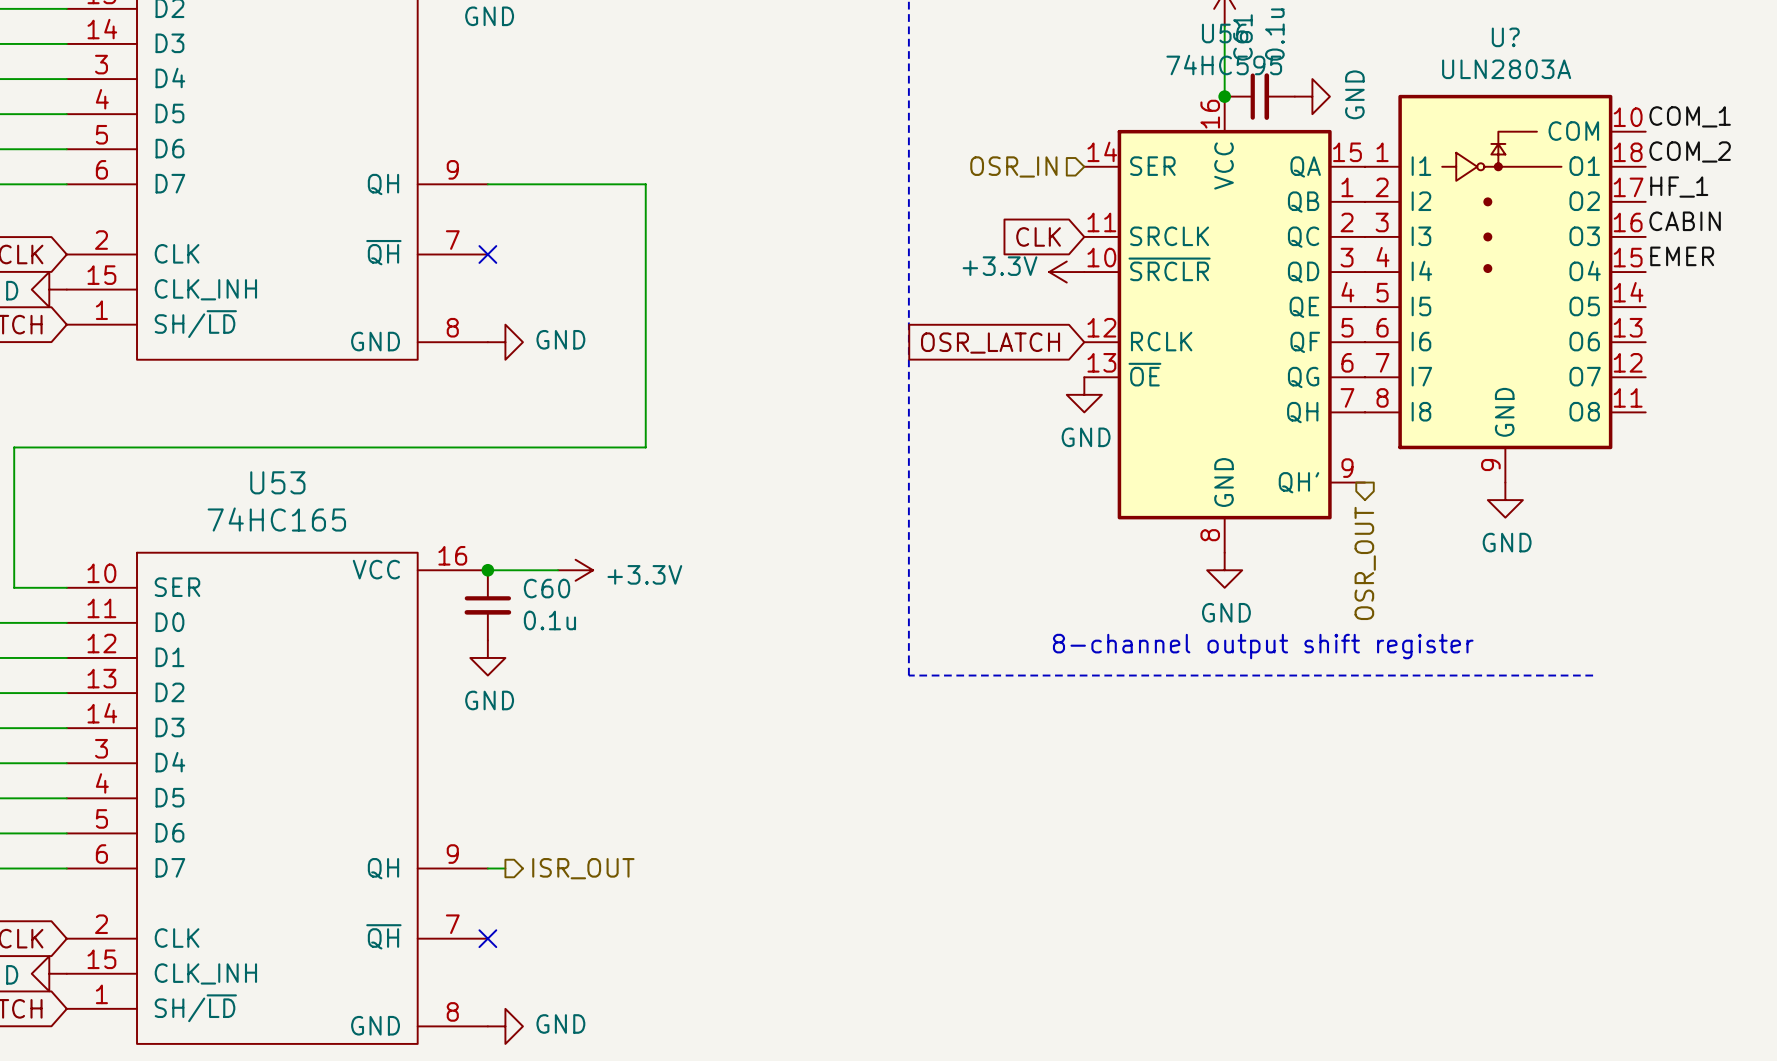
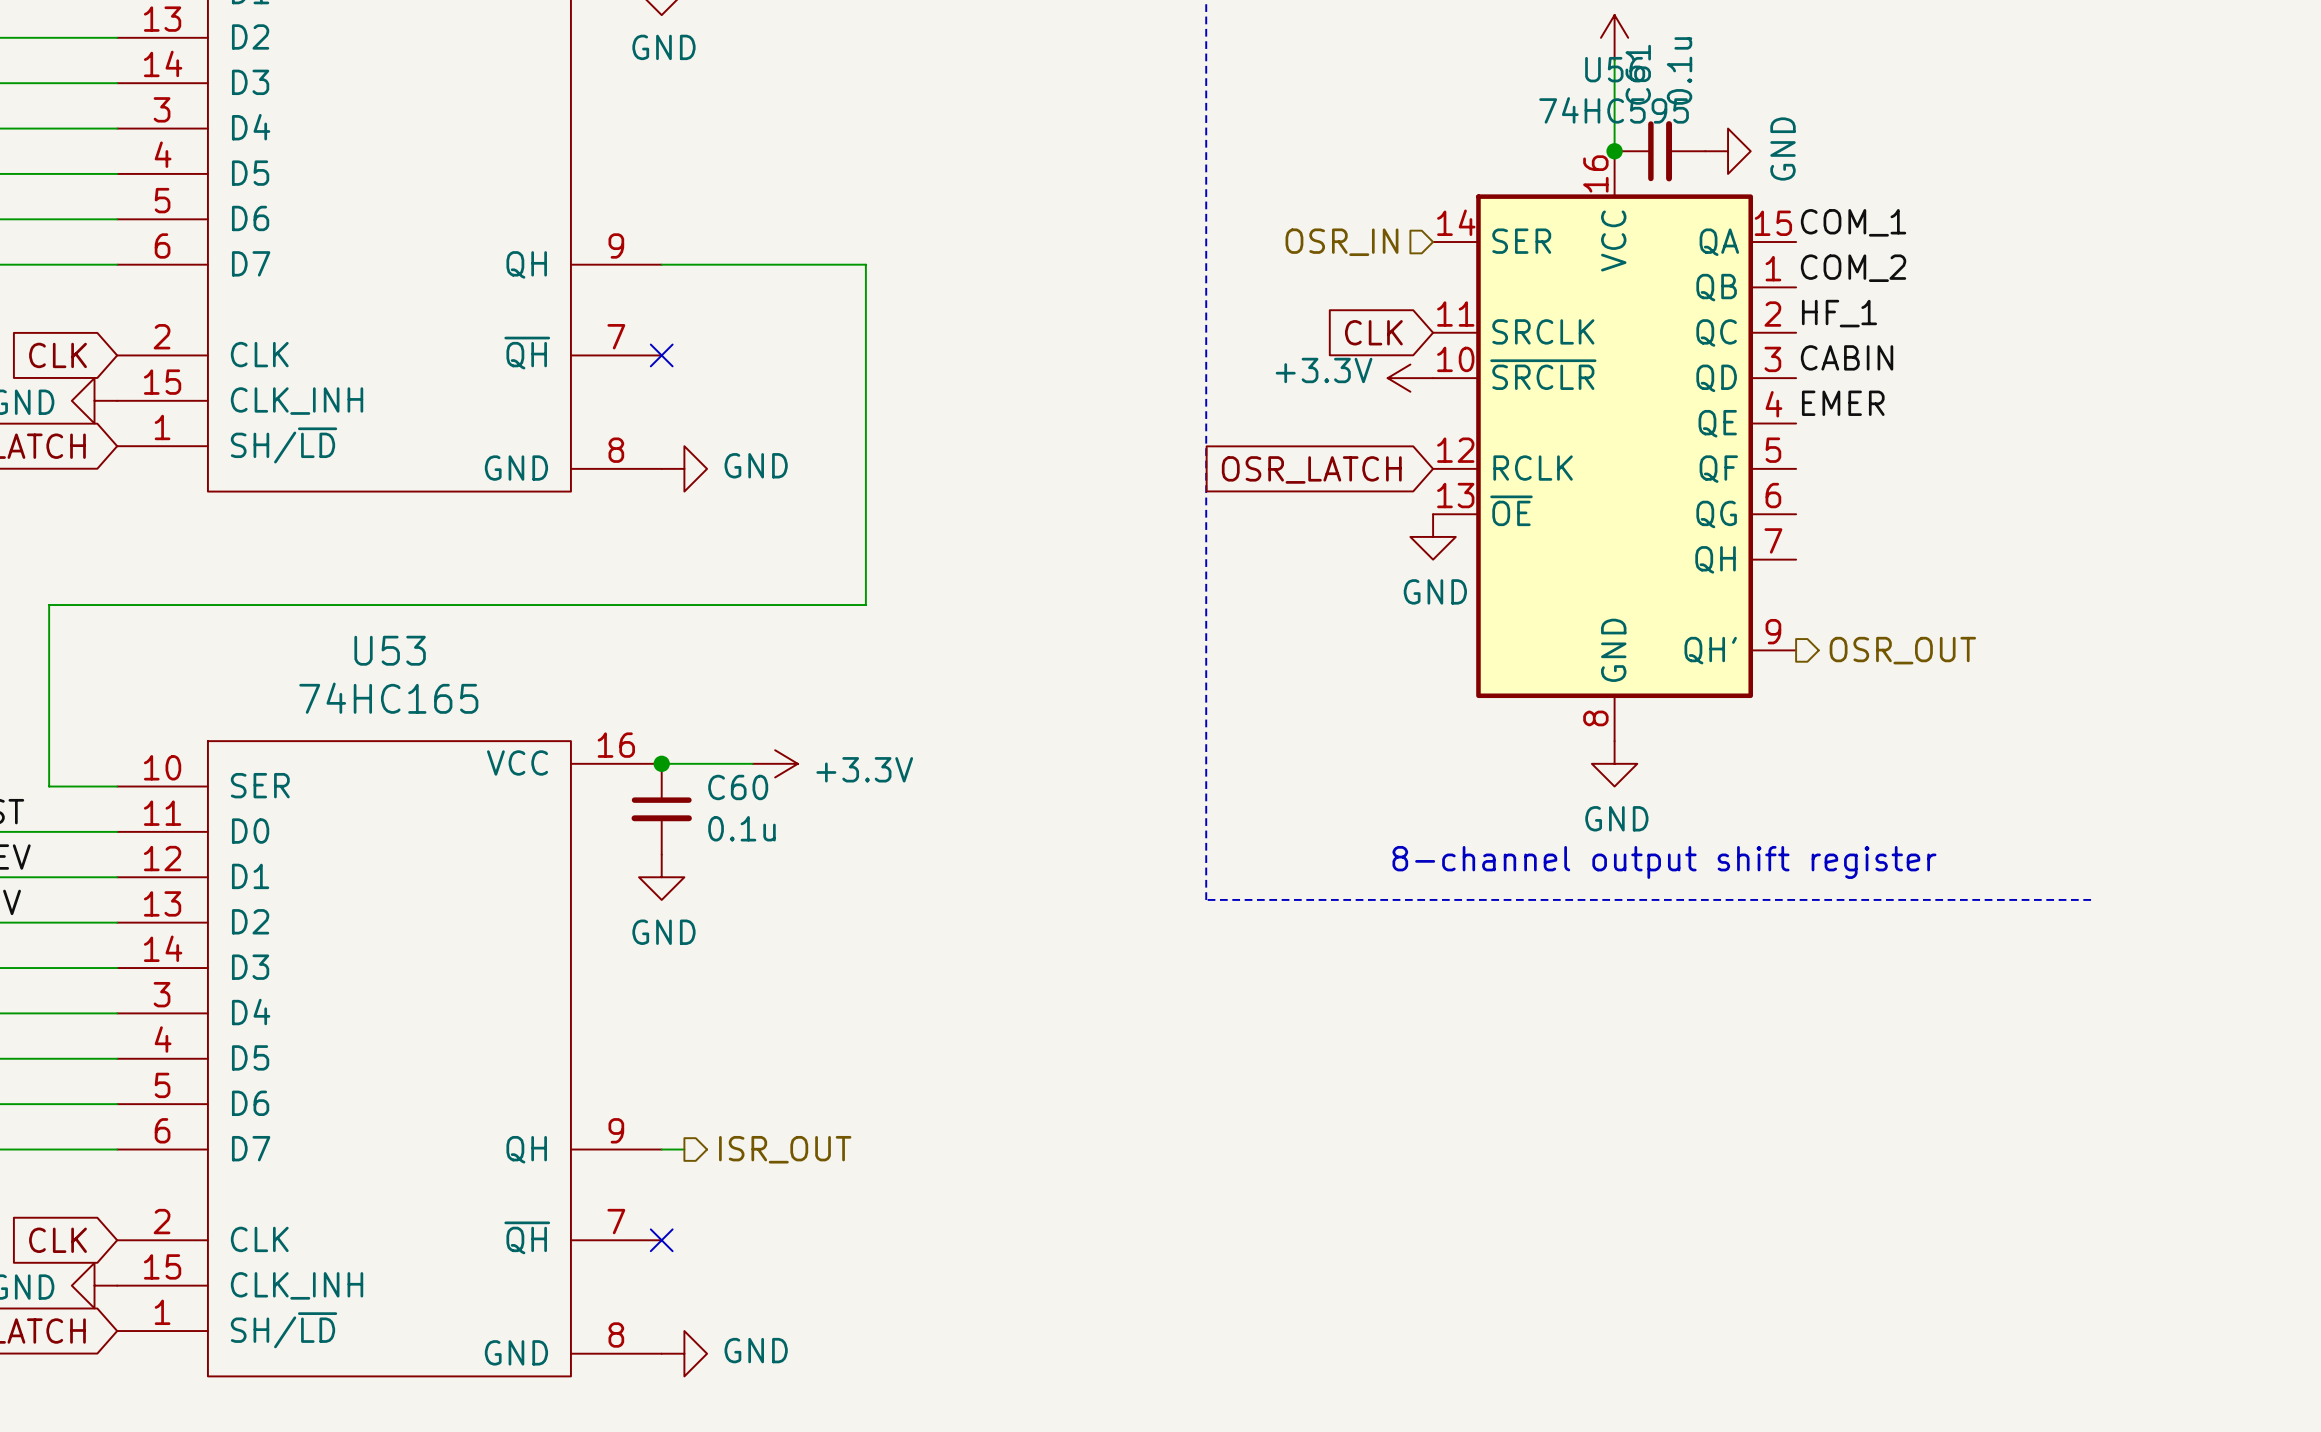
label position: COM_1 (1690, 116) -> COM_1 (1853, 222)
label position: COM_2 (1690, 151) -> COM_2 (1853, 268)
label position: HF_1 (1679, 187) -> HF_1 (1839, 313)
label position: CABIN (1685, 221) -> CABIN (1847, 357)
label position: EMER (1682, 256) -> EMER (1843, 403)
U?: ULN2803A (1505, 288) -> none
power symbol: GND (1505, 500) -> none
hierarchical label rotation: 0° (1365, 563) -> 90° counterclockwise (1902, 650)

